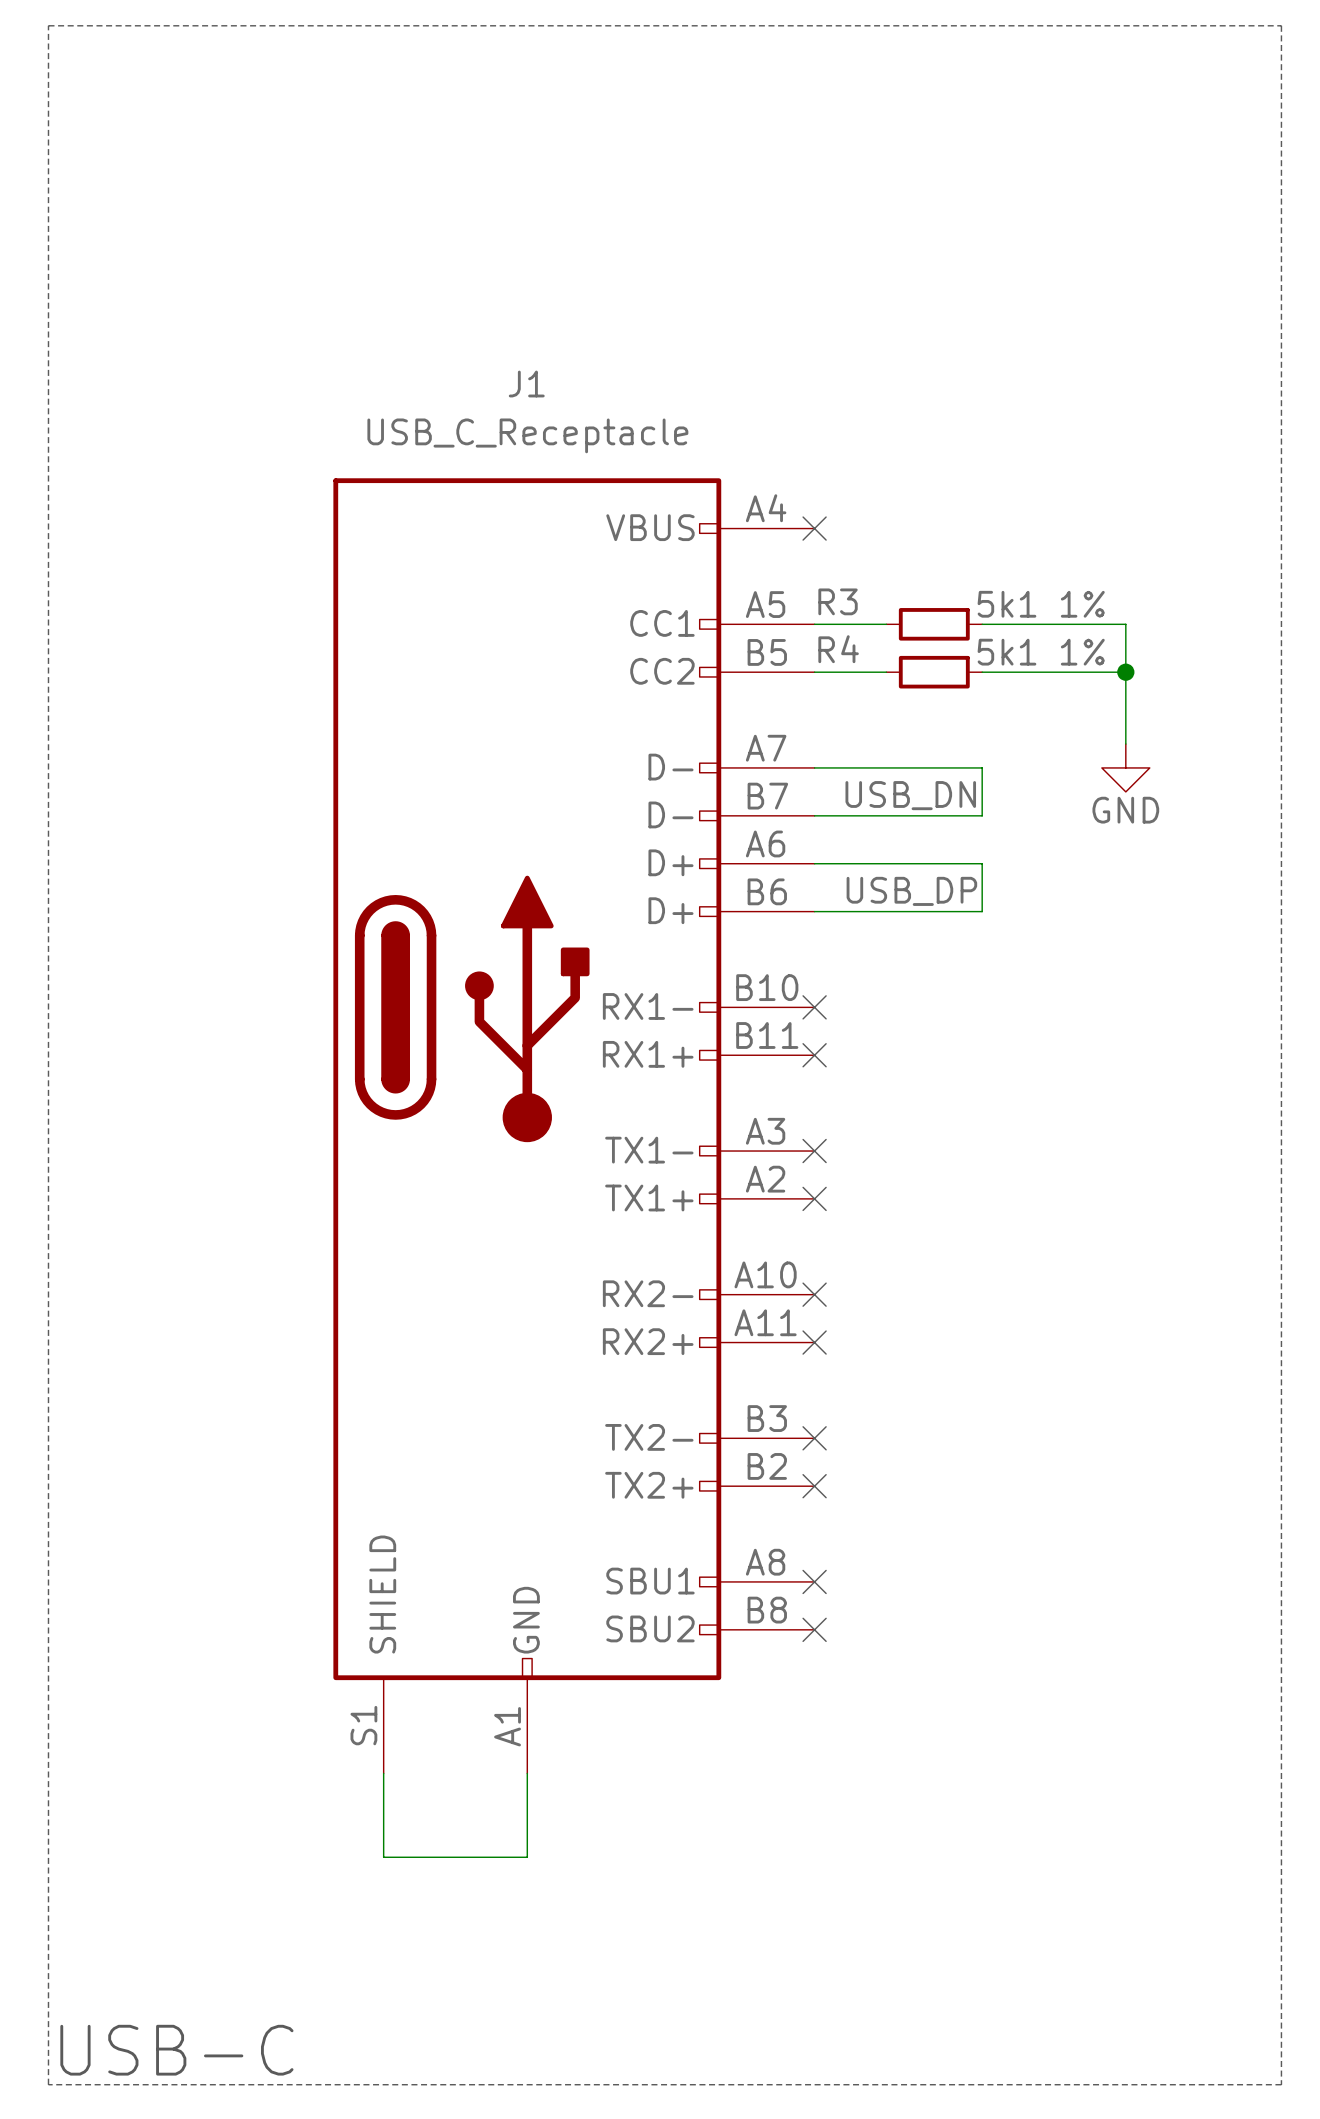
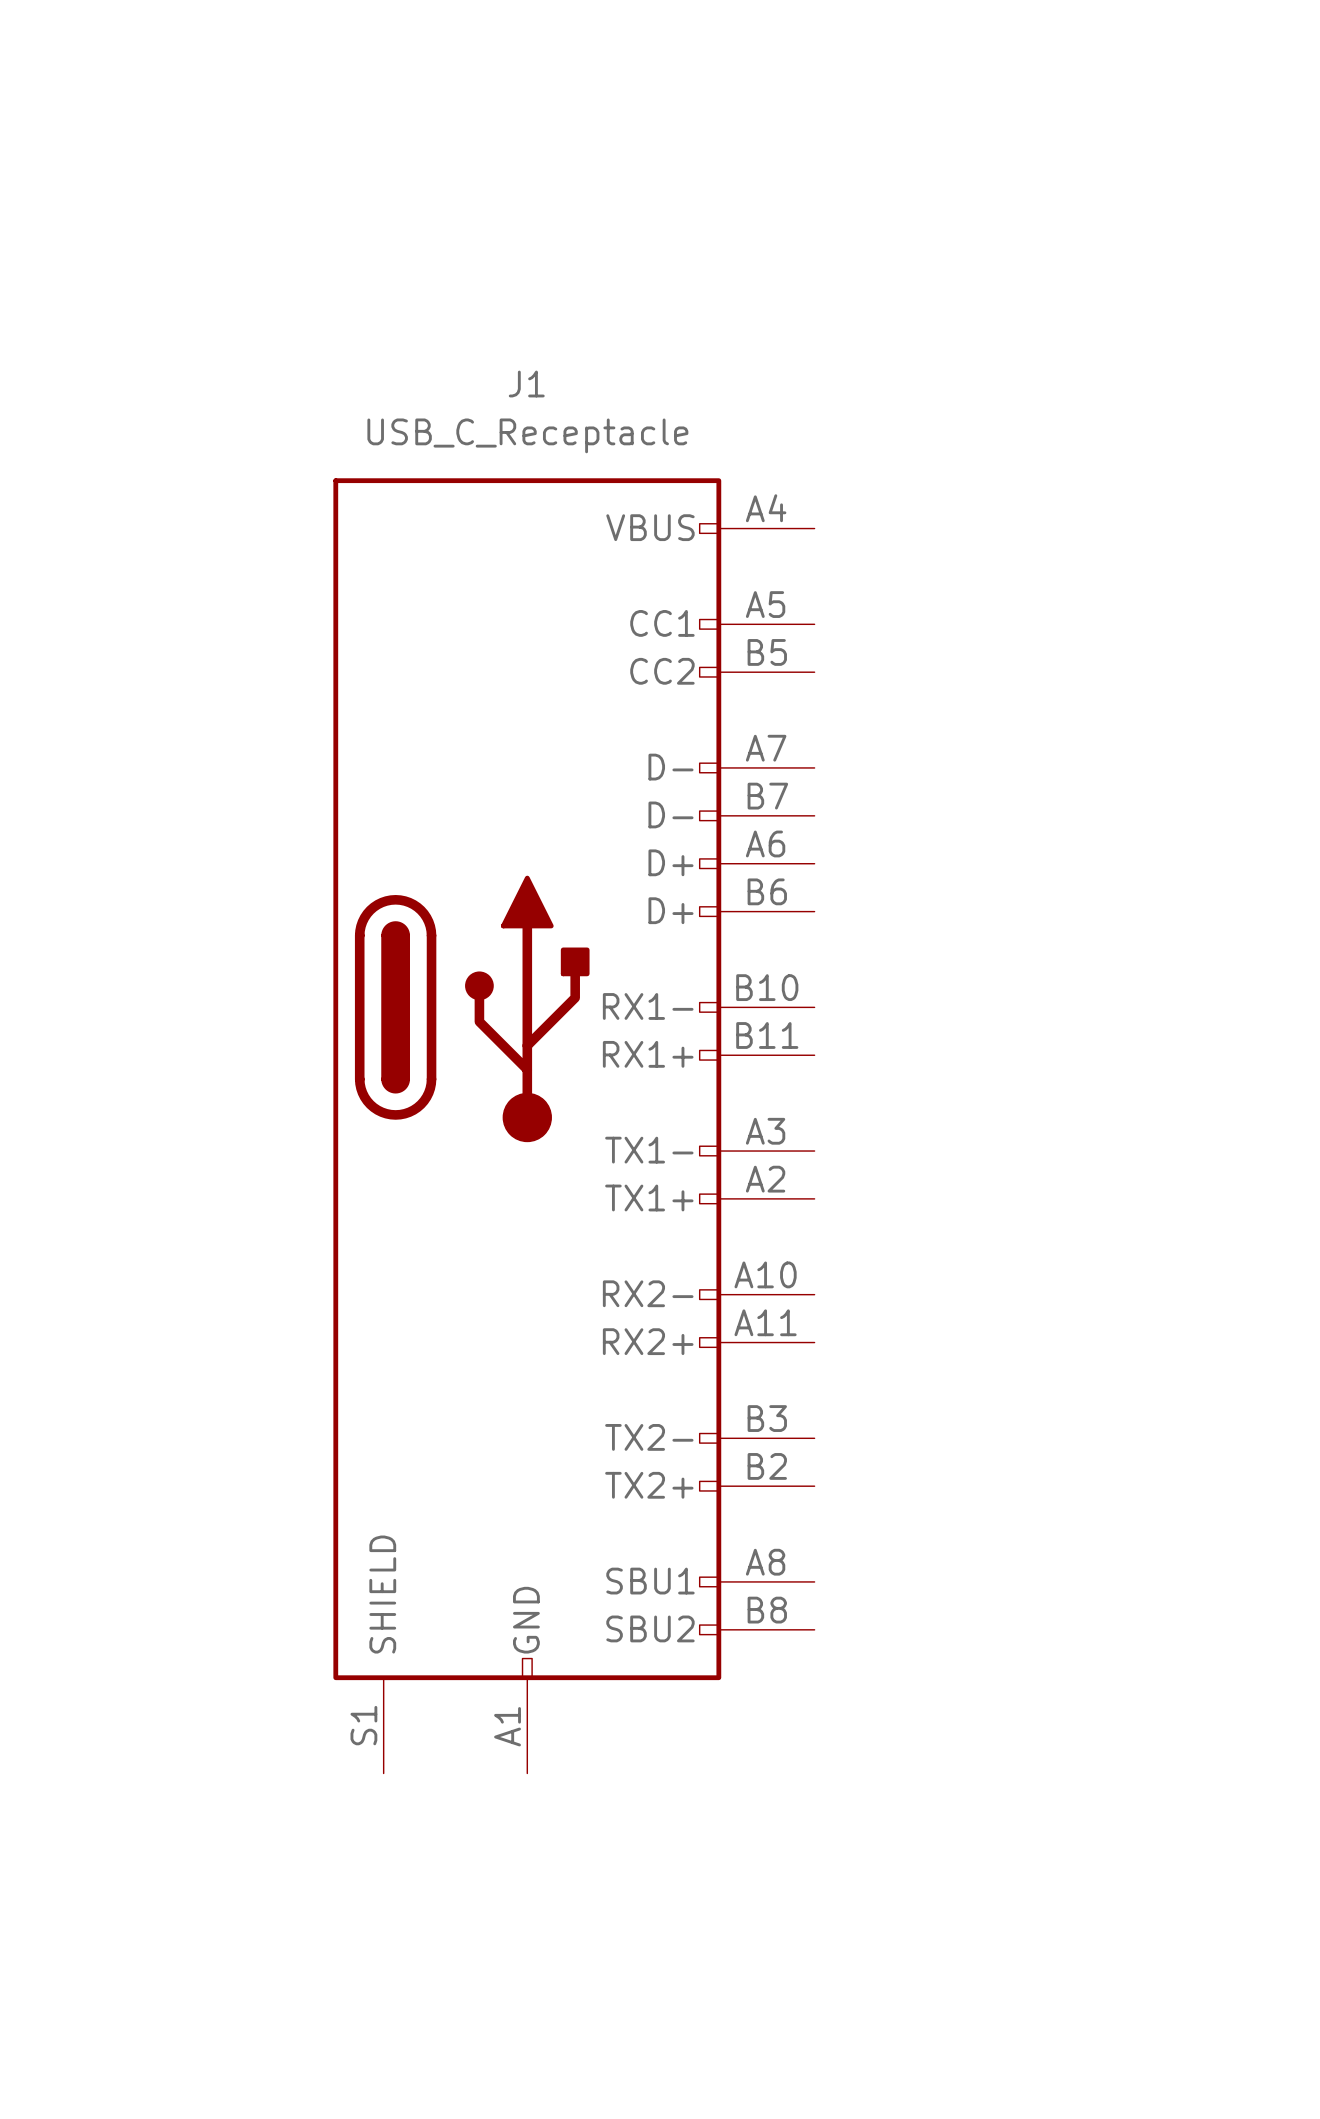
line: (48, 25) (48, 2084) (1281, 2084) (1281, 25) (48, 25) -> none
no-connect mark: (814, 528) -> none
wire: (814, 624) (886, 624) -> none
R3: 5k1 1% (934, 624) -> none
wire: (982, 624) (1125, 624) (1125, 744) -> none
wire: (814, 672) (886, 672) -> none
R4: 5k1 1% (934, 672) -> none
wire: (982, 672) (1125, 672) -> none
junction: (1125, 672) -> none
wire: (814, 767) (982, 767) (982, 815) (814, 815) -> none
power symbol: GND (1125, 767) -> none
label: USB_DN (910, 795) -> none
wire: (814, 863) (982, 863) (982, 911) (814, 911) -> none
label: USB_DP (911, 891) -> none
no-connect mark: (814, 1007) -> none
no-connect mark: (814, 1055) -> none
no-connect mark: (814, 1151) -> none
no-connect mark: (814, 1198) -> none
no-connect mark: (814, 1294) -> none
no-connect mark: (814, 1342) -> none
no-connect mark: (814, 1438) -> none
no-connect mark: (814, 1486) -> none
no-connect mark: (814, 1581) -> none
no-connect mark: (814, 1629) -> none
wire: (383, 1773) (383, 1857) (527, 1857) (527, 1773) -> none
text: USB-C (176, 2050) -> none

